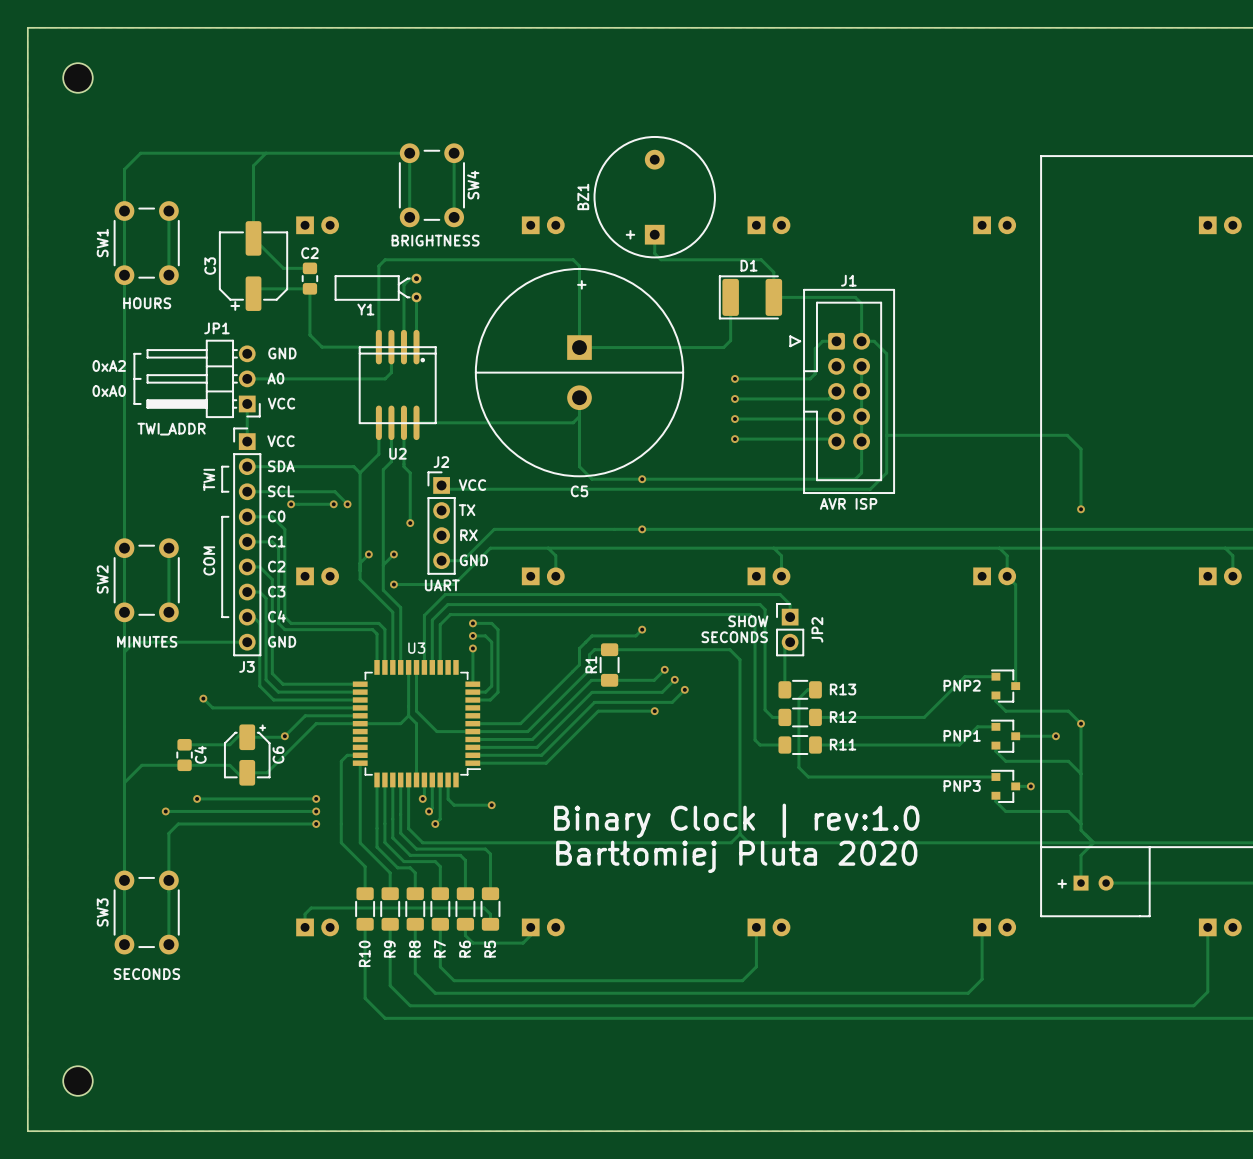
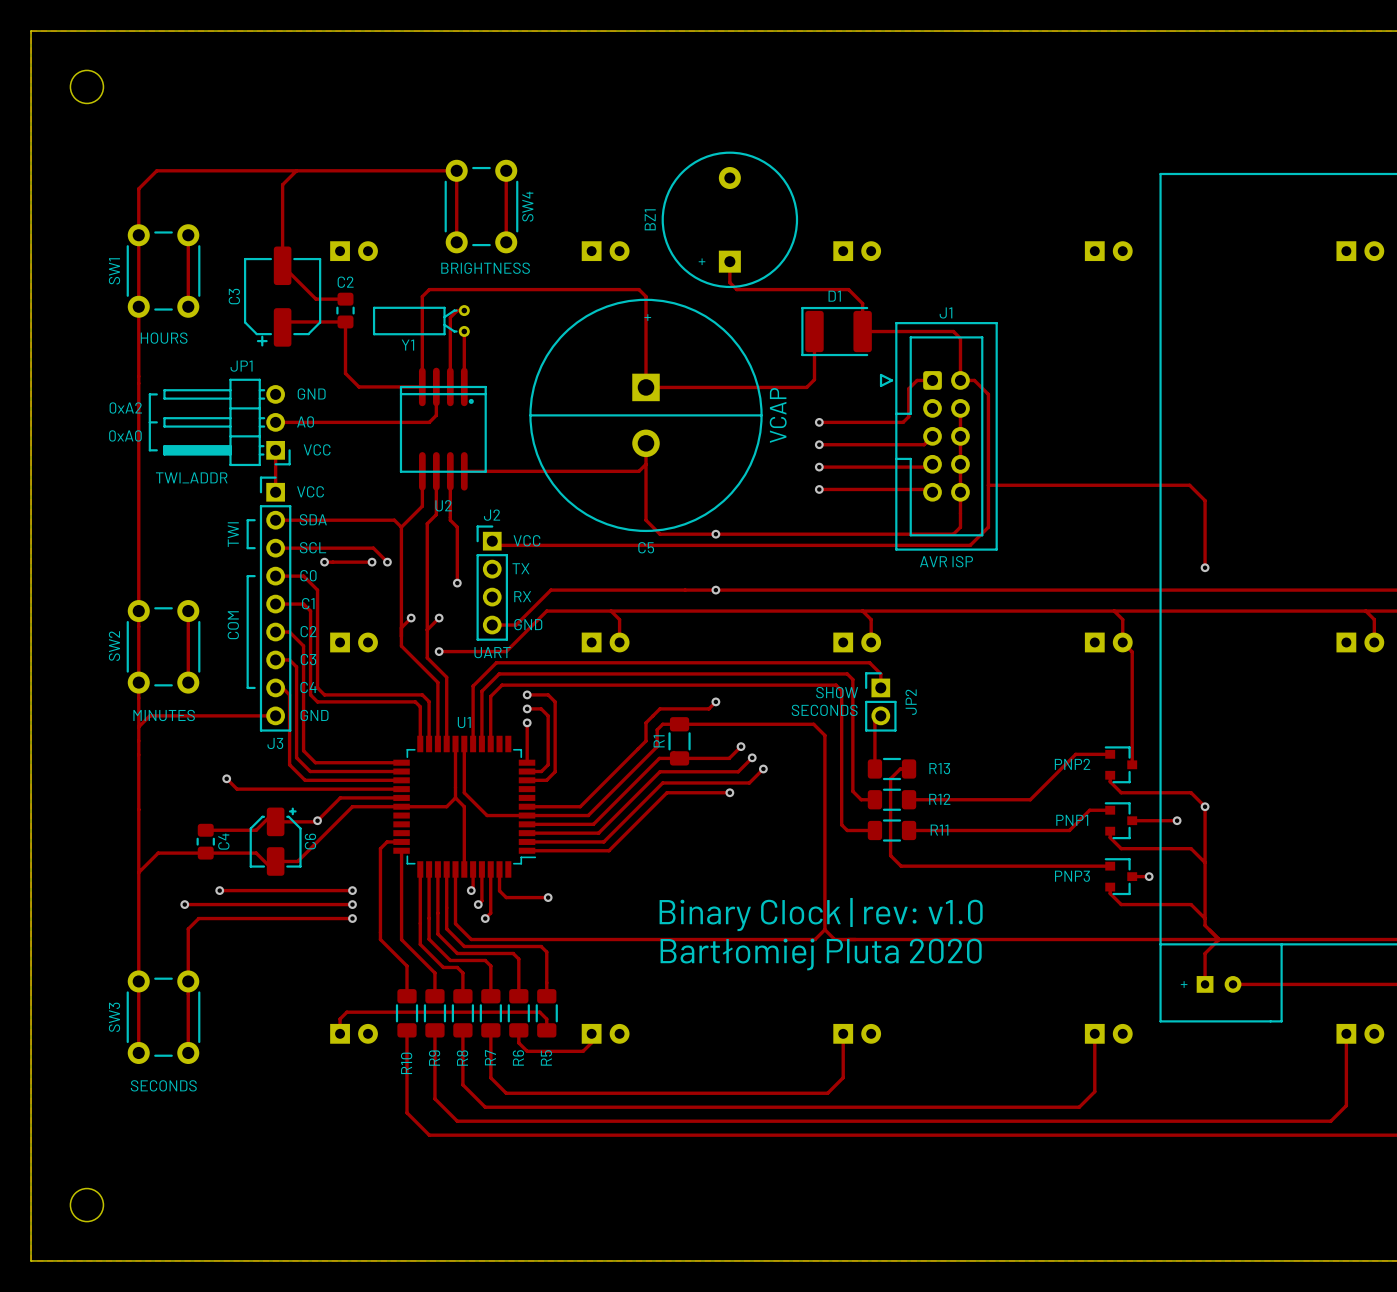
text: none -> VCAP (778, 415)
U3 name: U3 (416, 648) -> U1 (464, 722)
text: Binary Clock | rev:1.0 (736, 820) -> Binary Clock | rev: v1.0 (821, 914)

